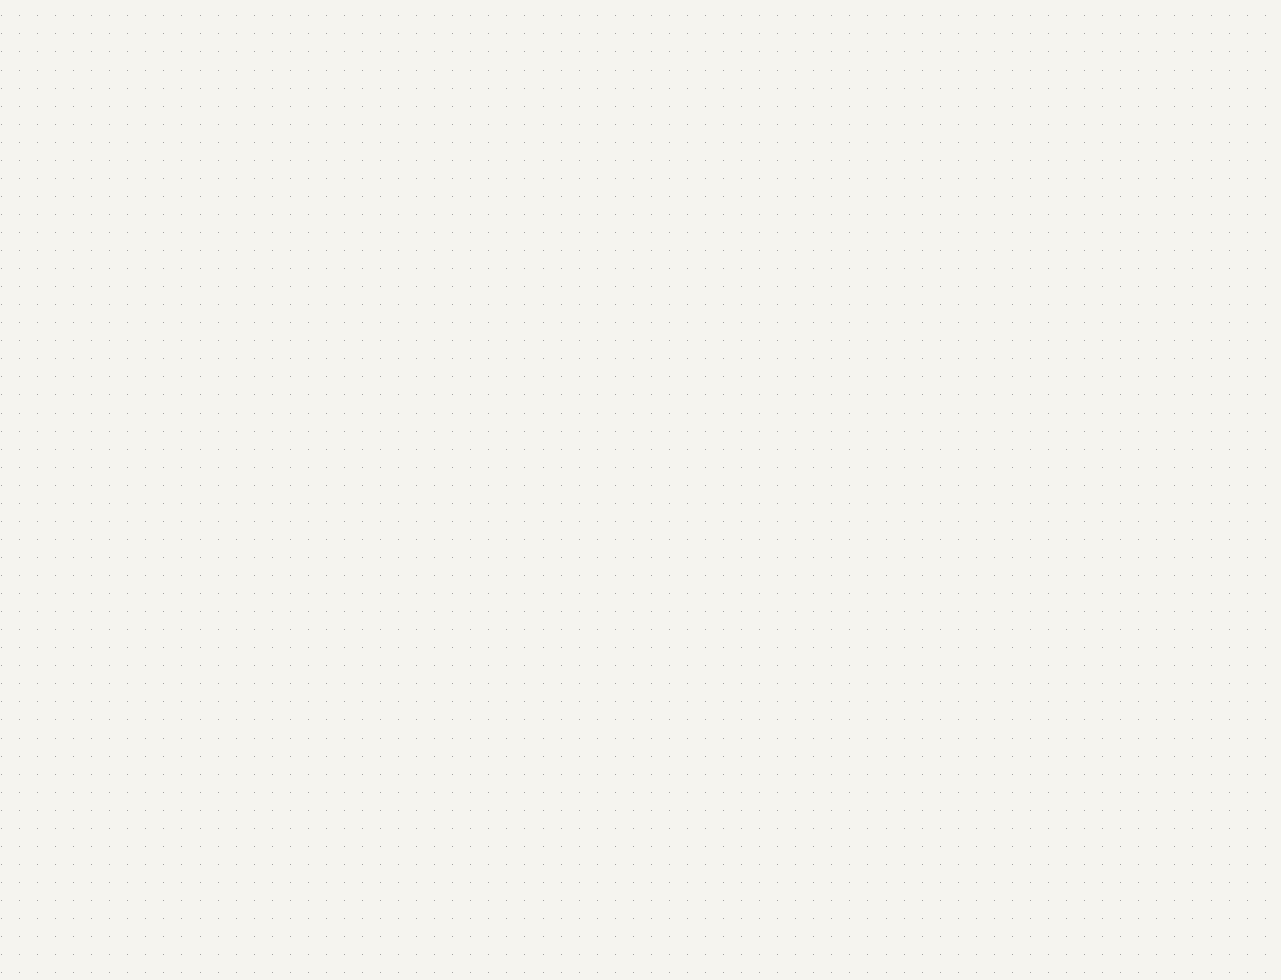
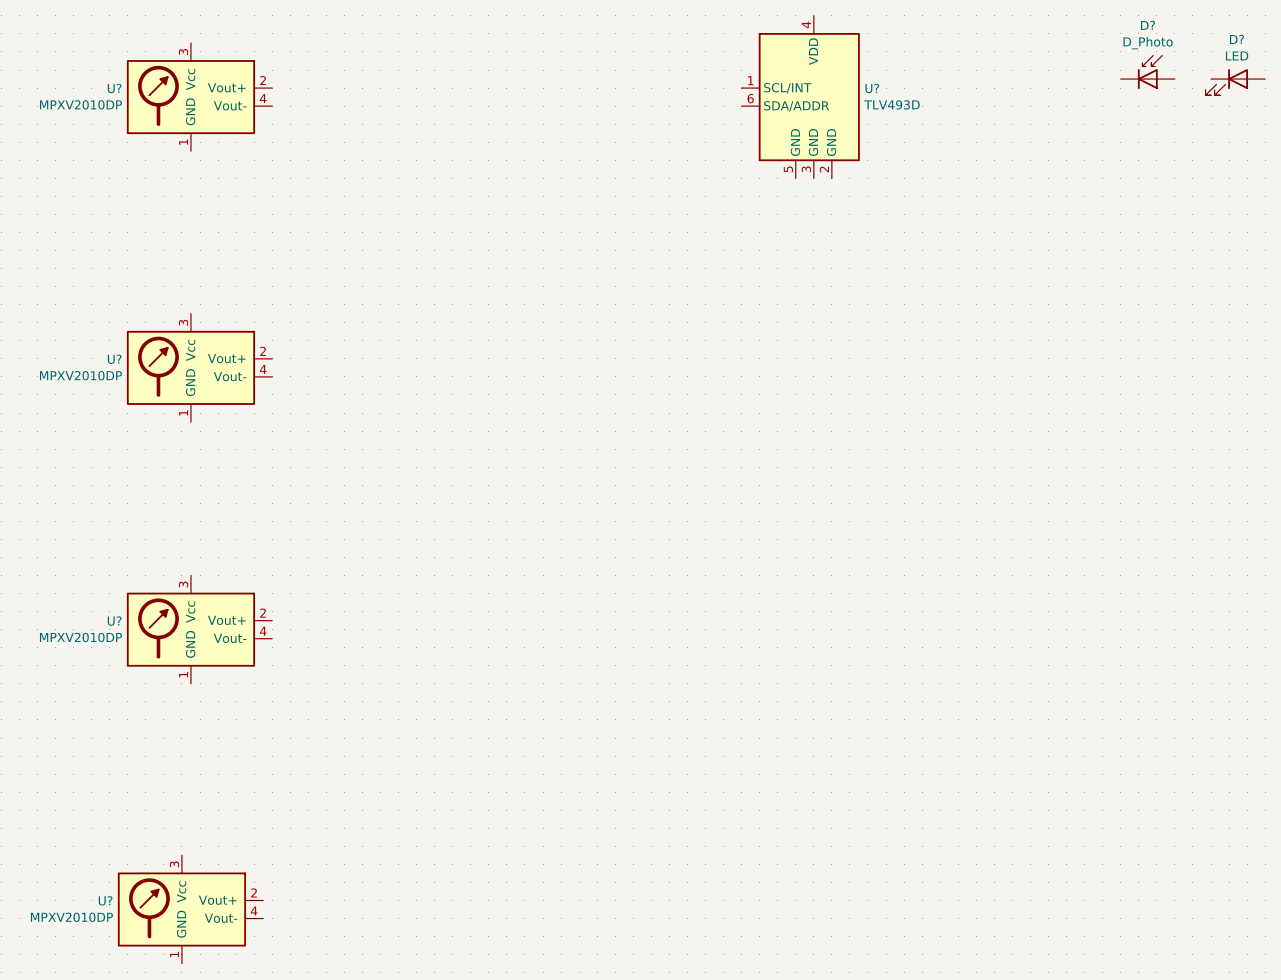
D?: none -> D_Photo (1147, 72)
D?: none -> LED (1235, 82)
U?: none -> MPXV2010DP (199, 97)
U?: none -> TLV493D (800, 97)
U?: none -> MPXV2010DP (199, 367)
U?: none -> MPXV2010DP (199, 629)
U?: none -> MPXV2010DP (190, 909)

